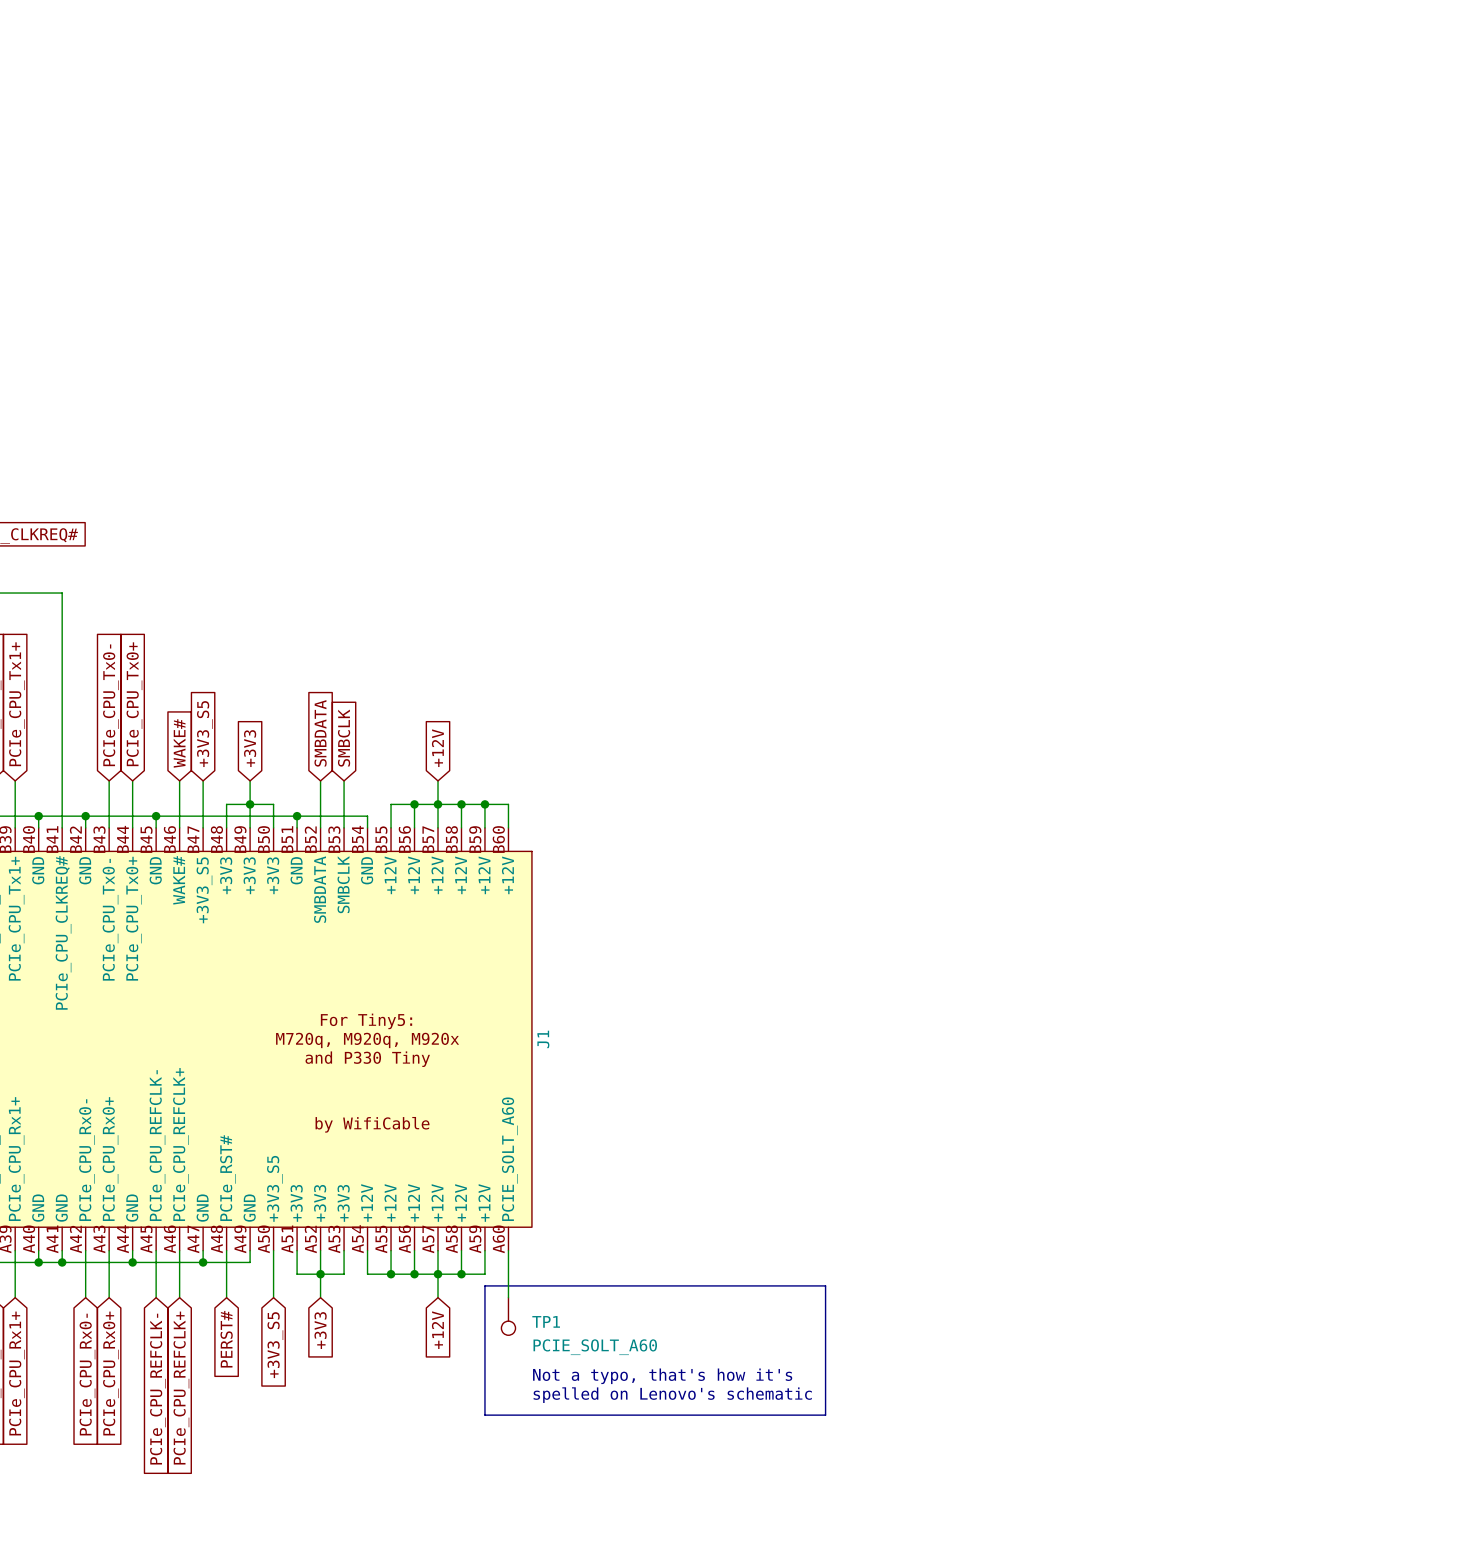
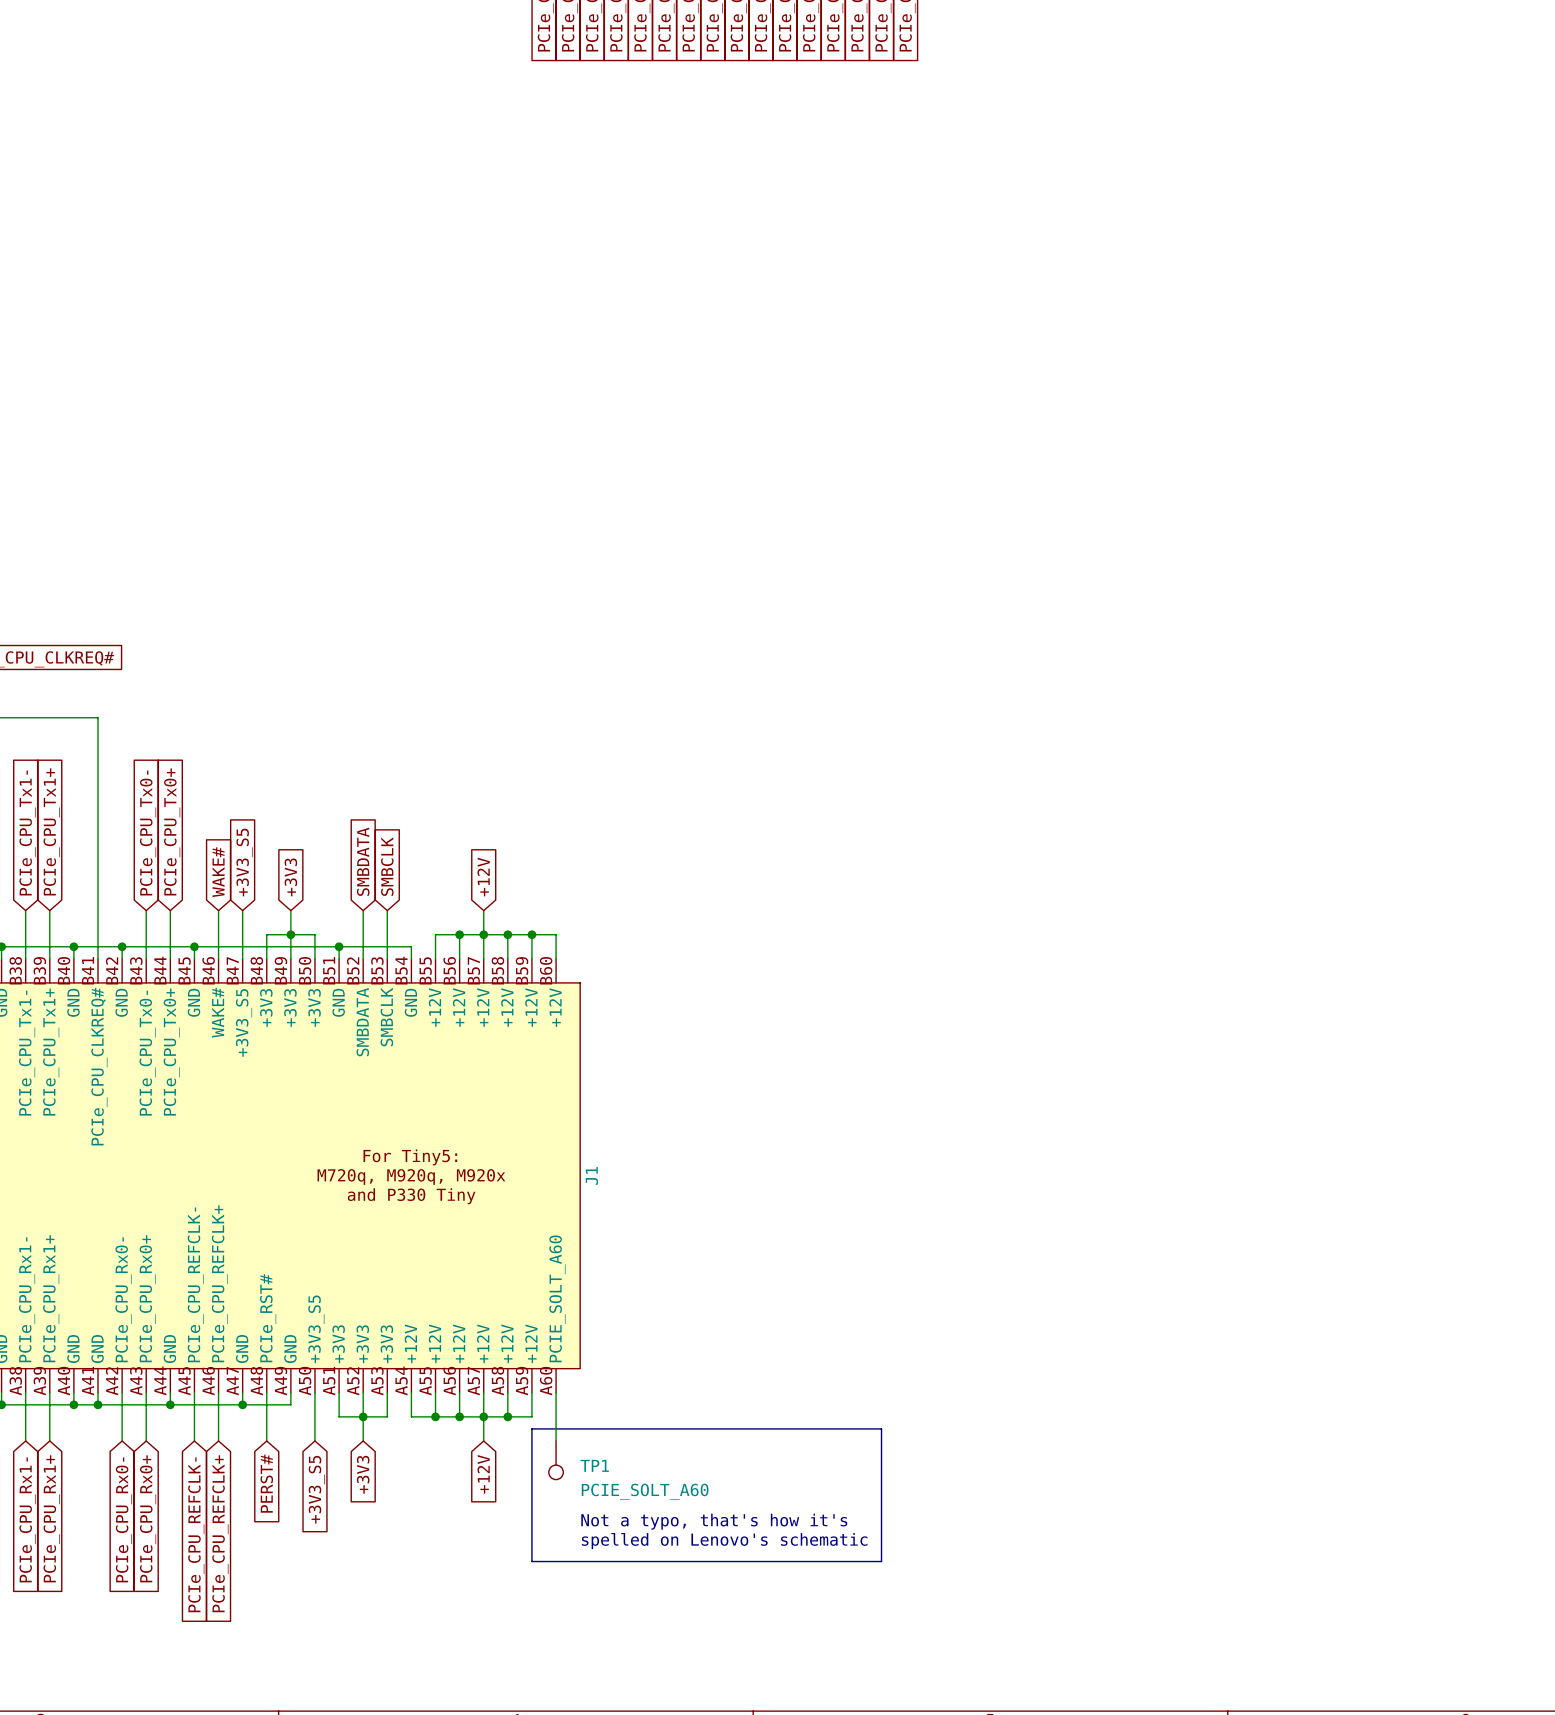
J1 text: by WifiCable (372, 1124) -> none

